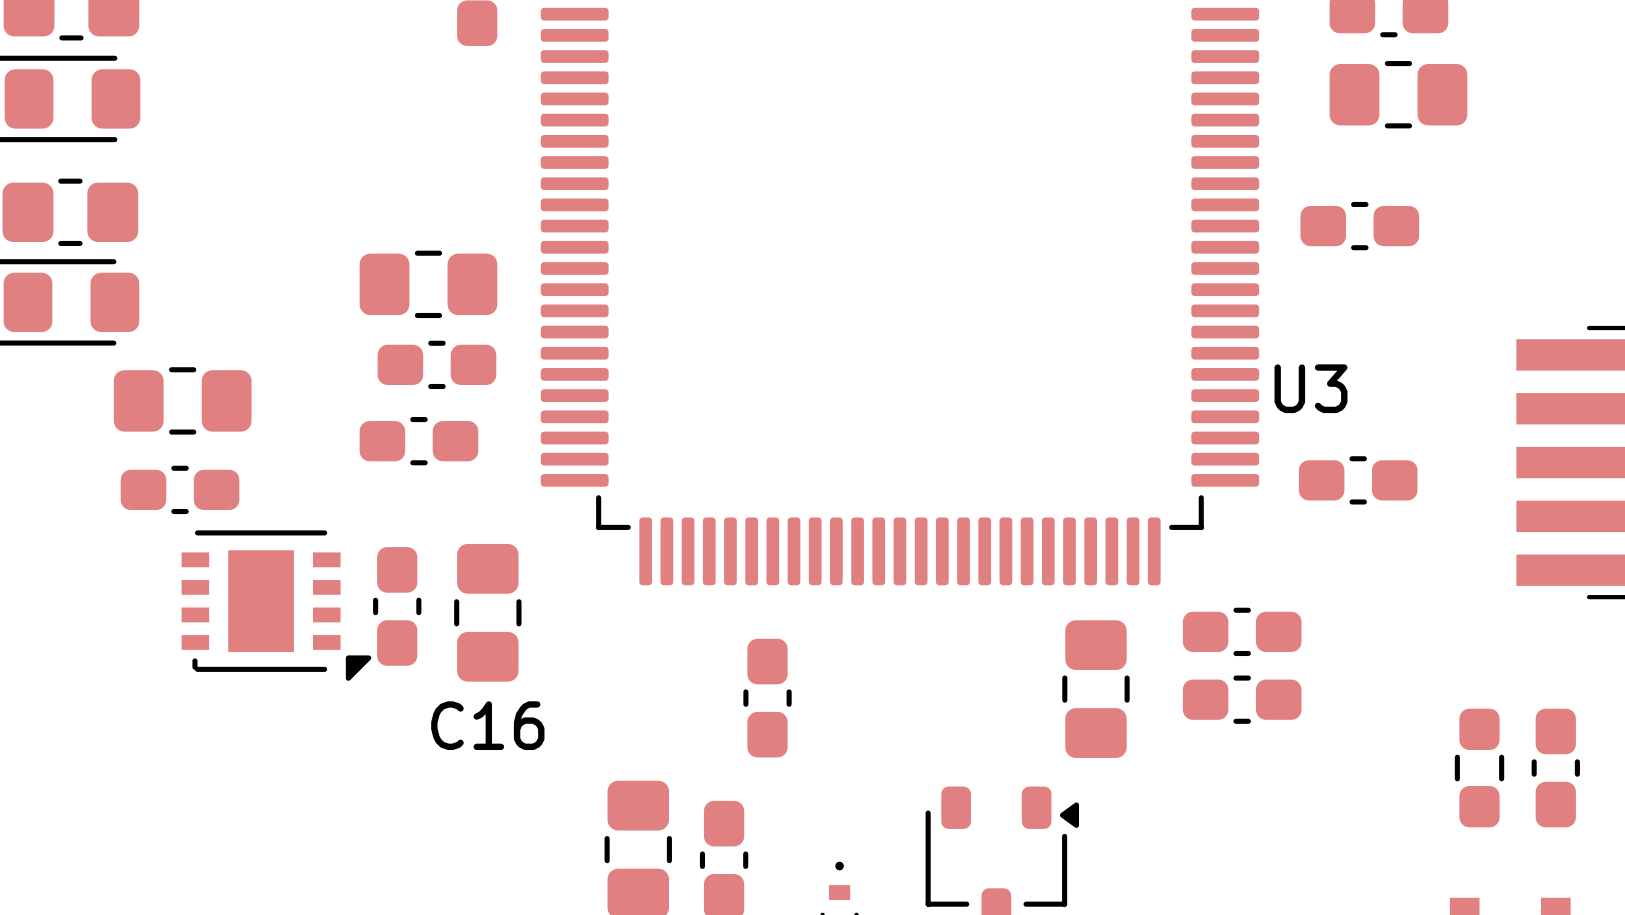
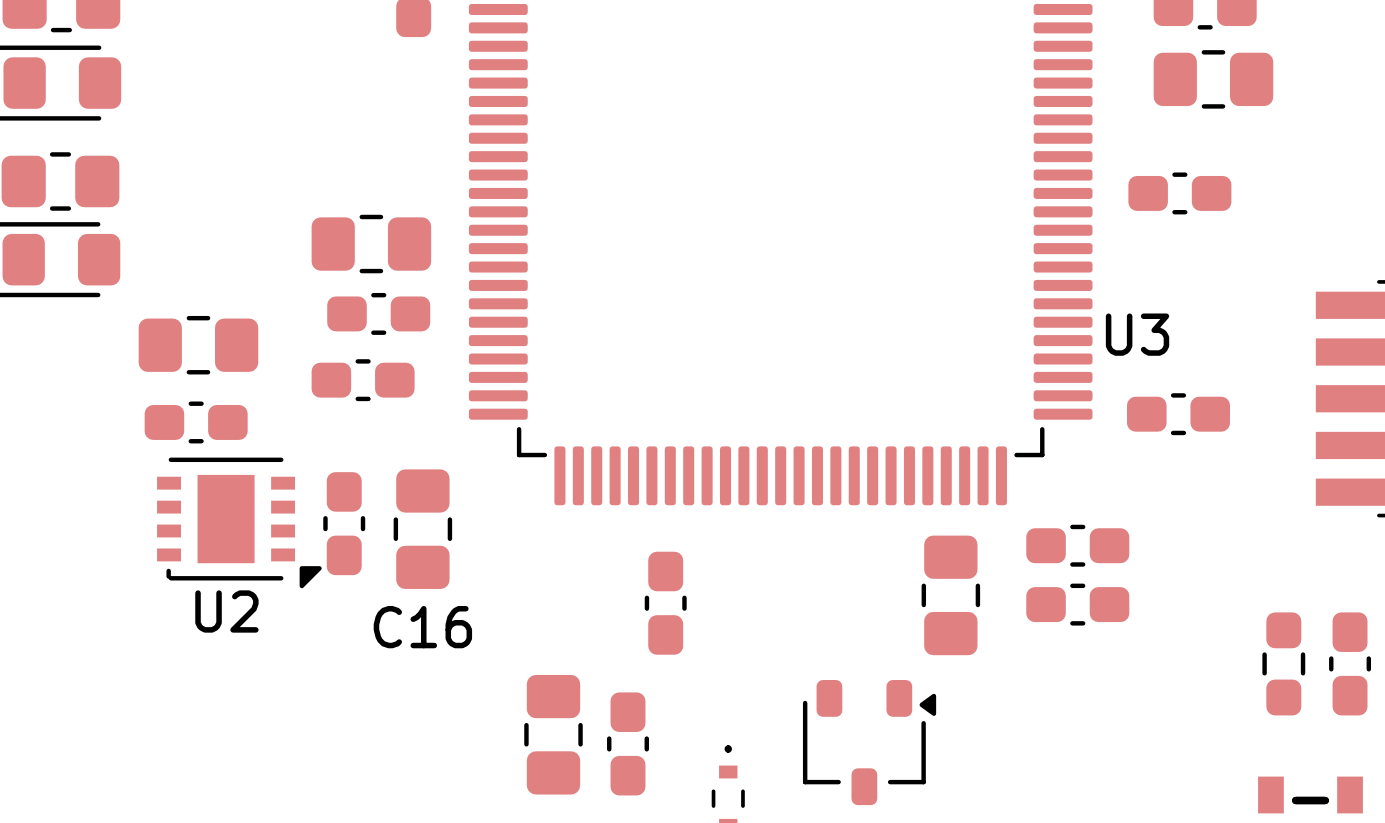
part position: (182, 400) -> (198, 345)
part position: (180, 489) -> (196, 422)
U2 name: none -> U2 (226, 611)

